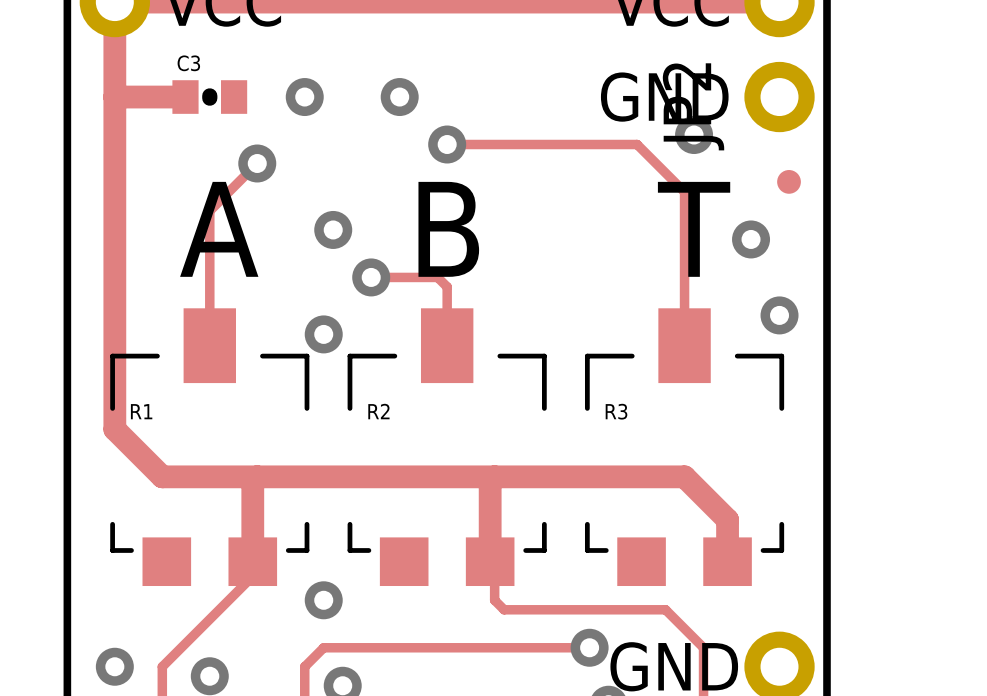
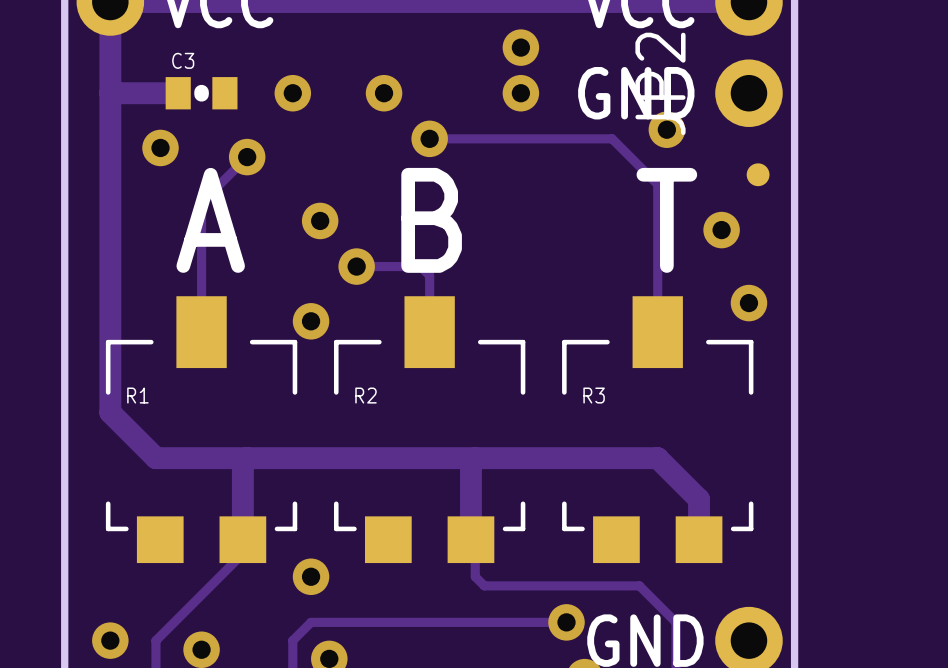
via: none -> (520, 47)
via: none -> (520, 93)
via: none -> (160, 147)

